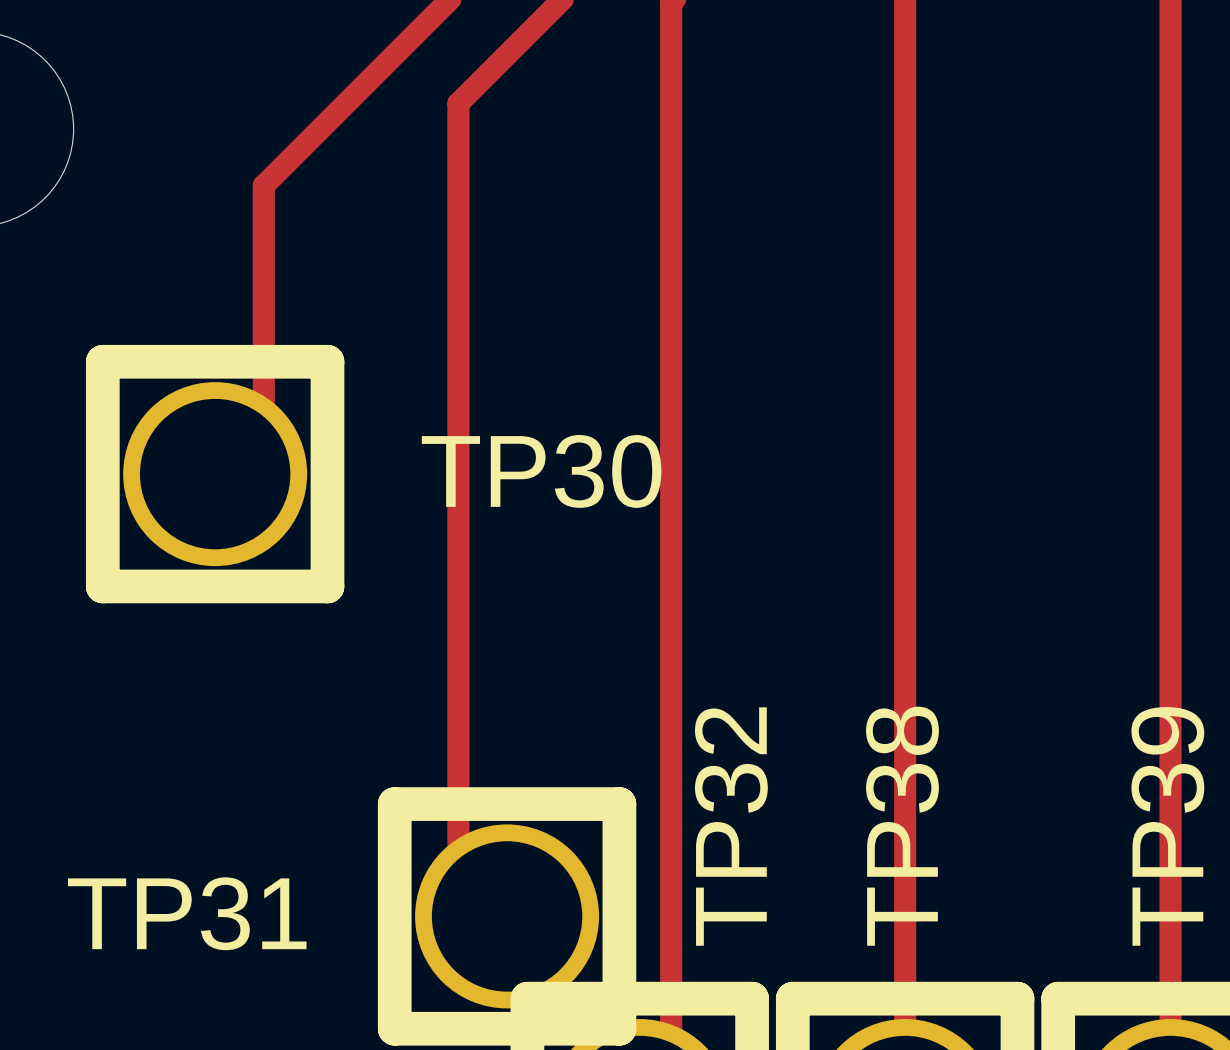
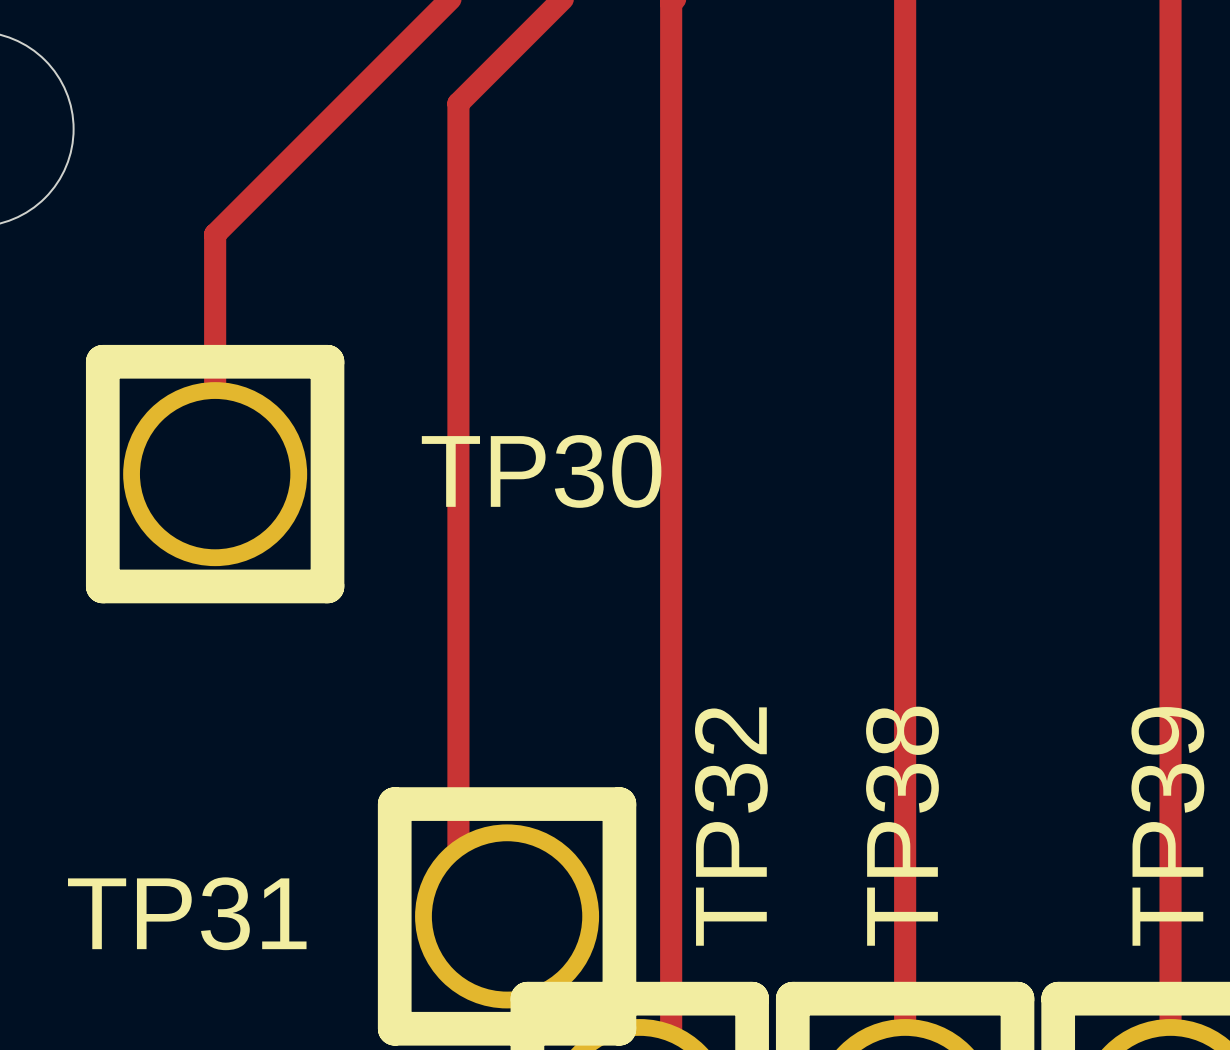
track: (263, 185) (263, 425) (215, 474) -> (263, 185) (215, 234) (215, 474)

